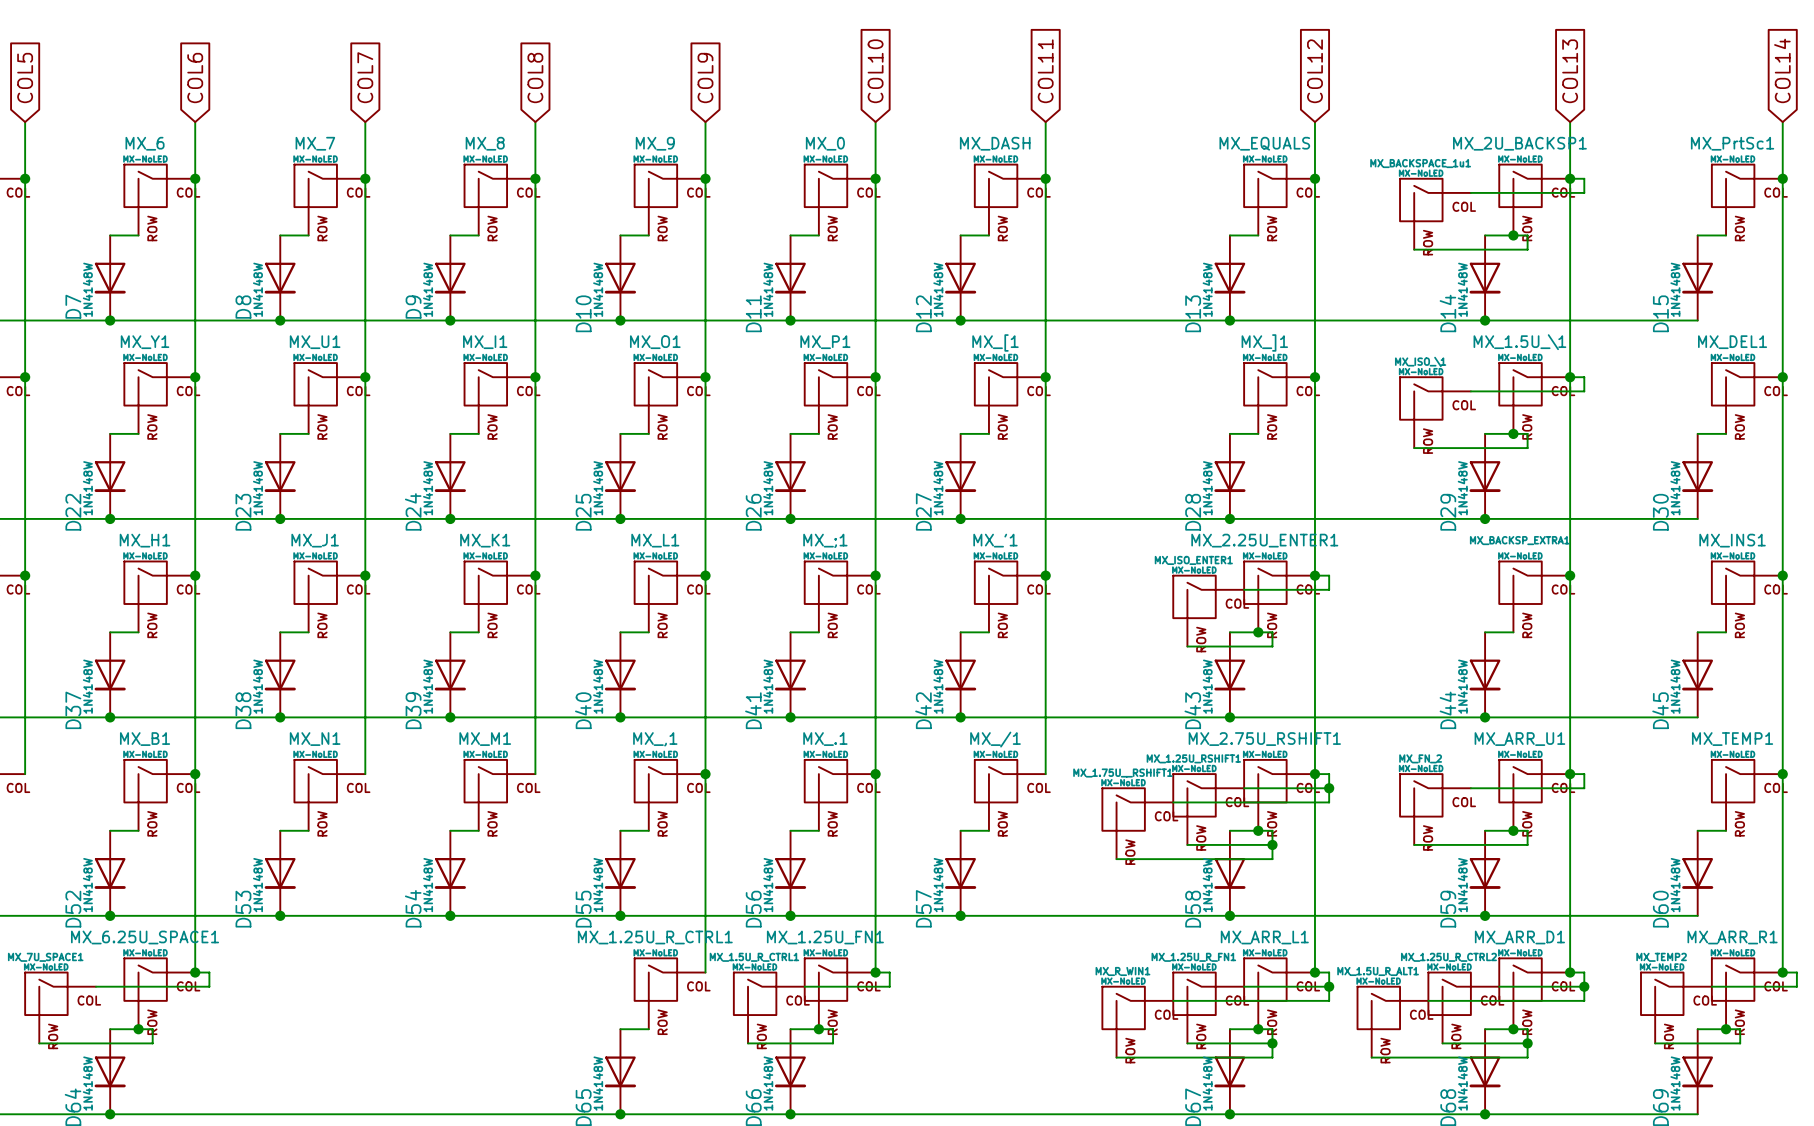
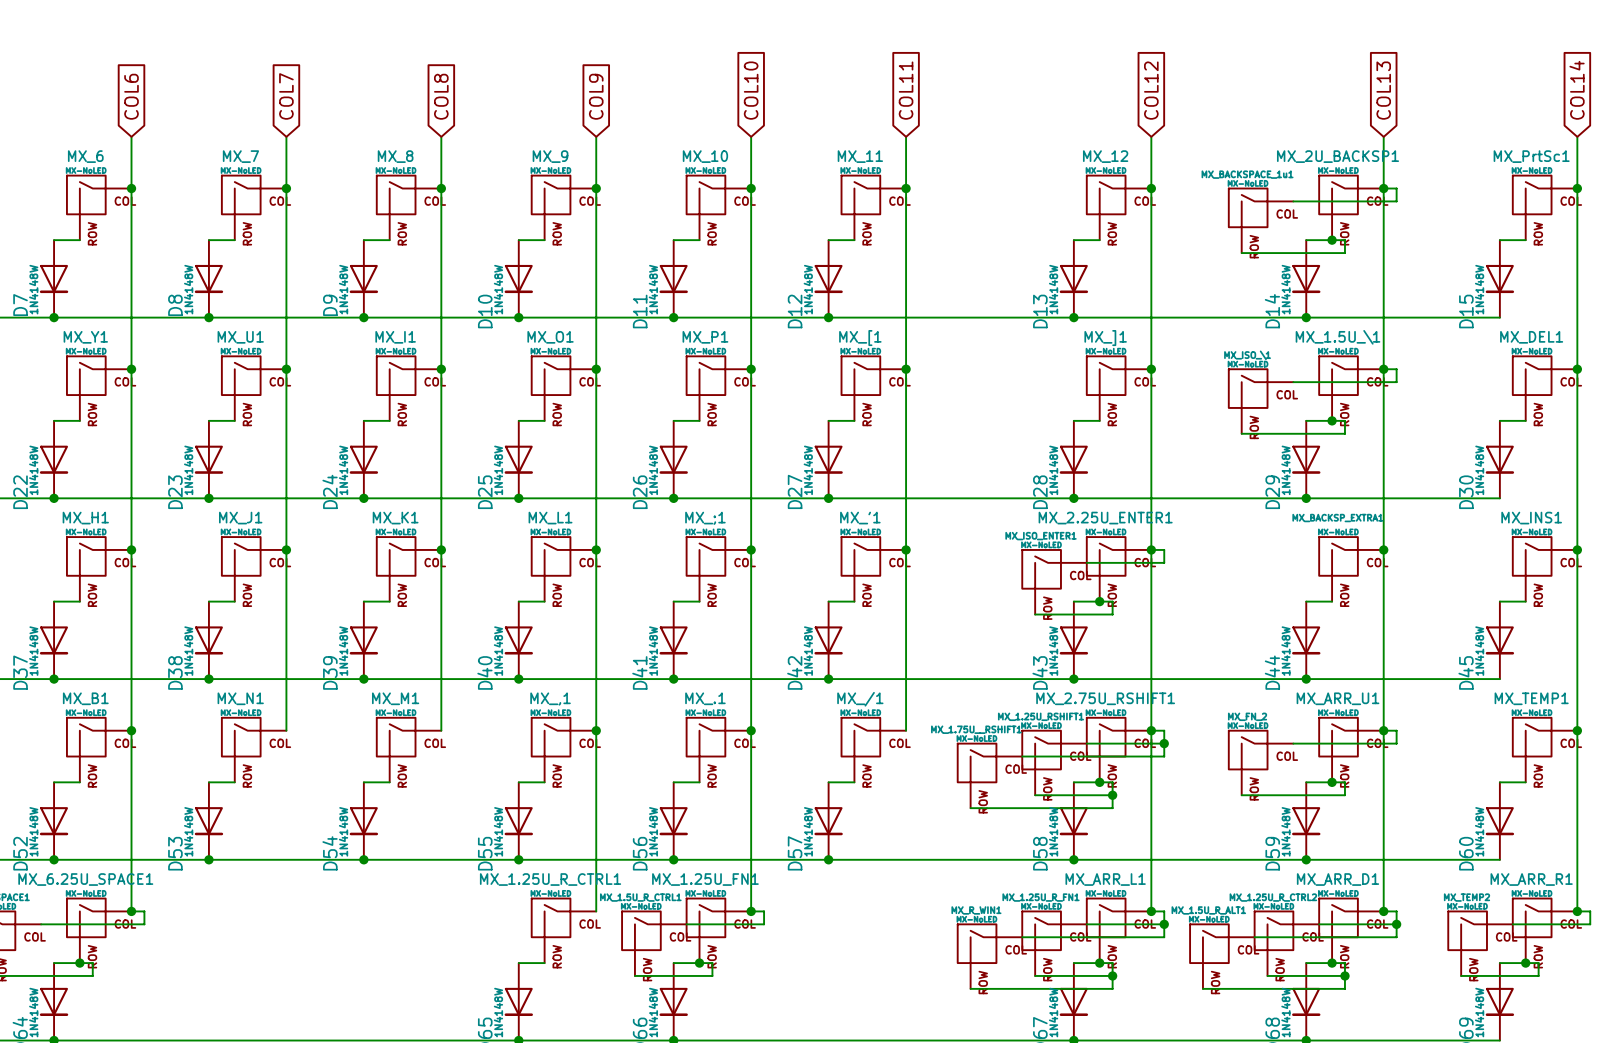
MX_0 name: MX_0 (825, 143) -> MX_10 (705, 156)
MX_DASH name: MX_DASH (995, 143) -> MX_11 (860, 156)
MX_EQUALS name: MX_EQUALS (1264, 143) -> MX_12 (1105, 156)

